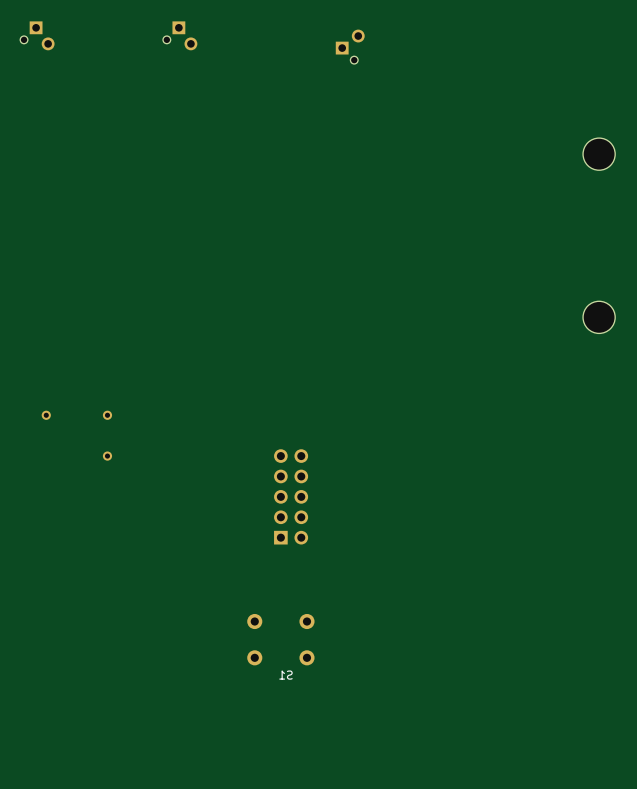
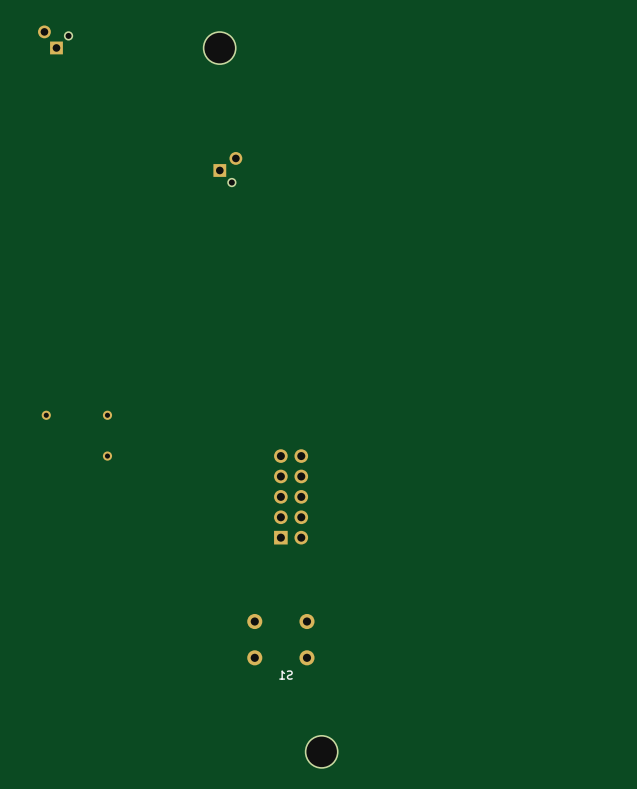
part rotation: 0° (37, 35) -> 180° (55, 39)
part: (180, 35) -> none
part: (350, 46) -> none
part: none -> (219, 48)
part: (599, 154) -> none
part: none -> (227, 169)
part: (599, 317) -> none
part: none -> (321, 751)

